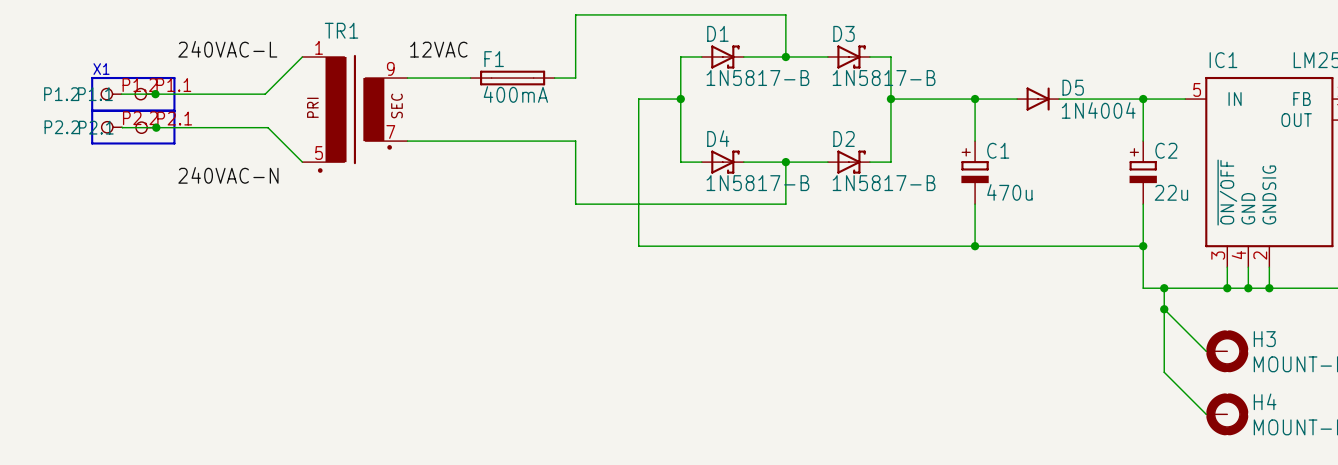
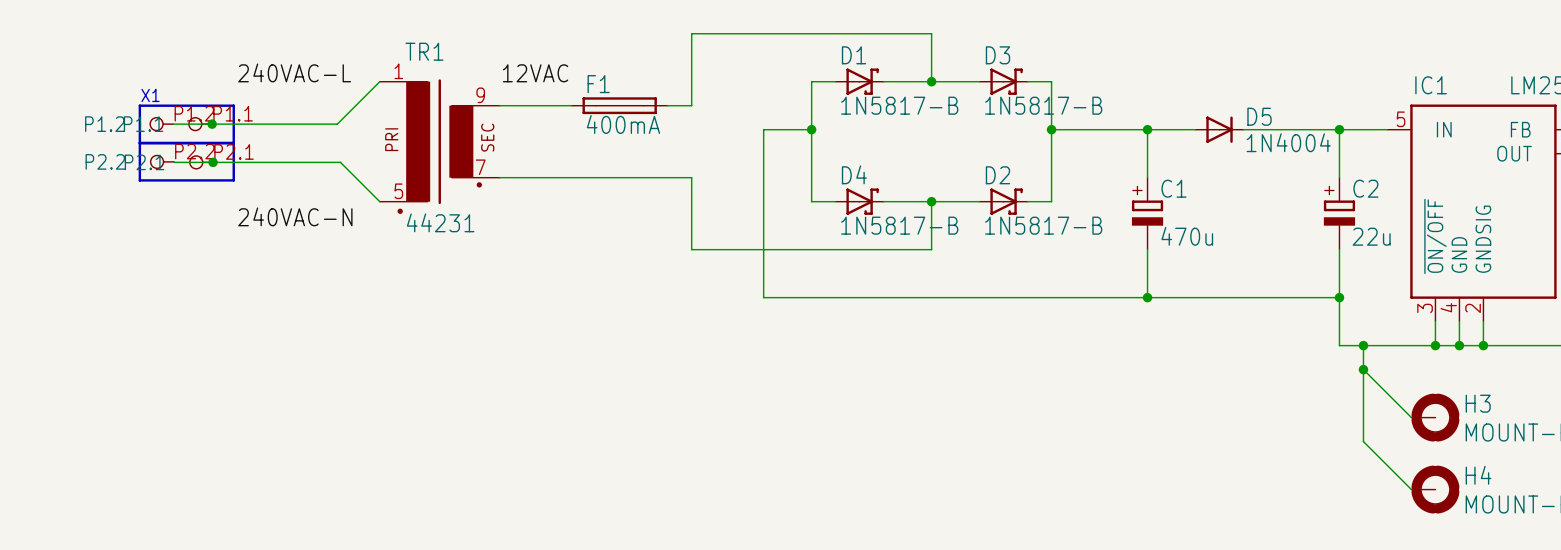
TR1 value: none -> 44231 (440, 222)

